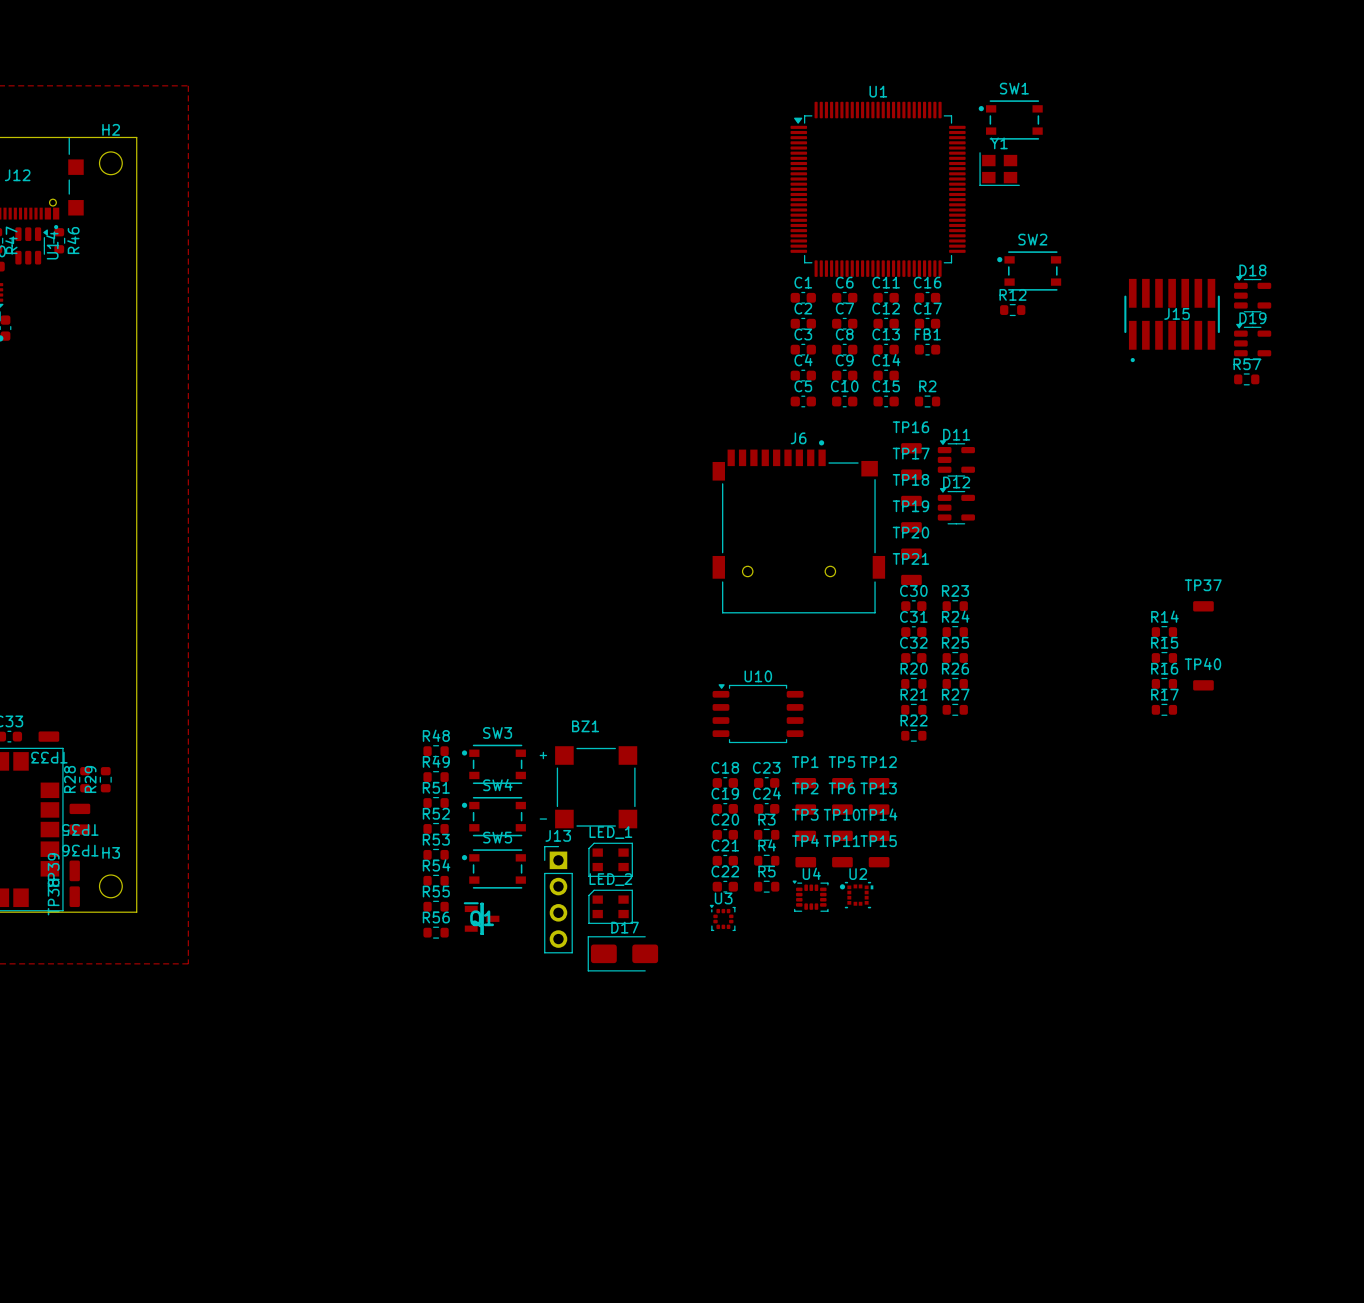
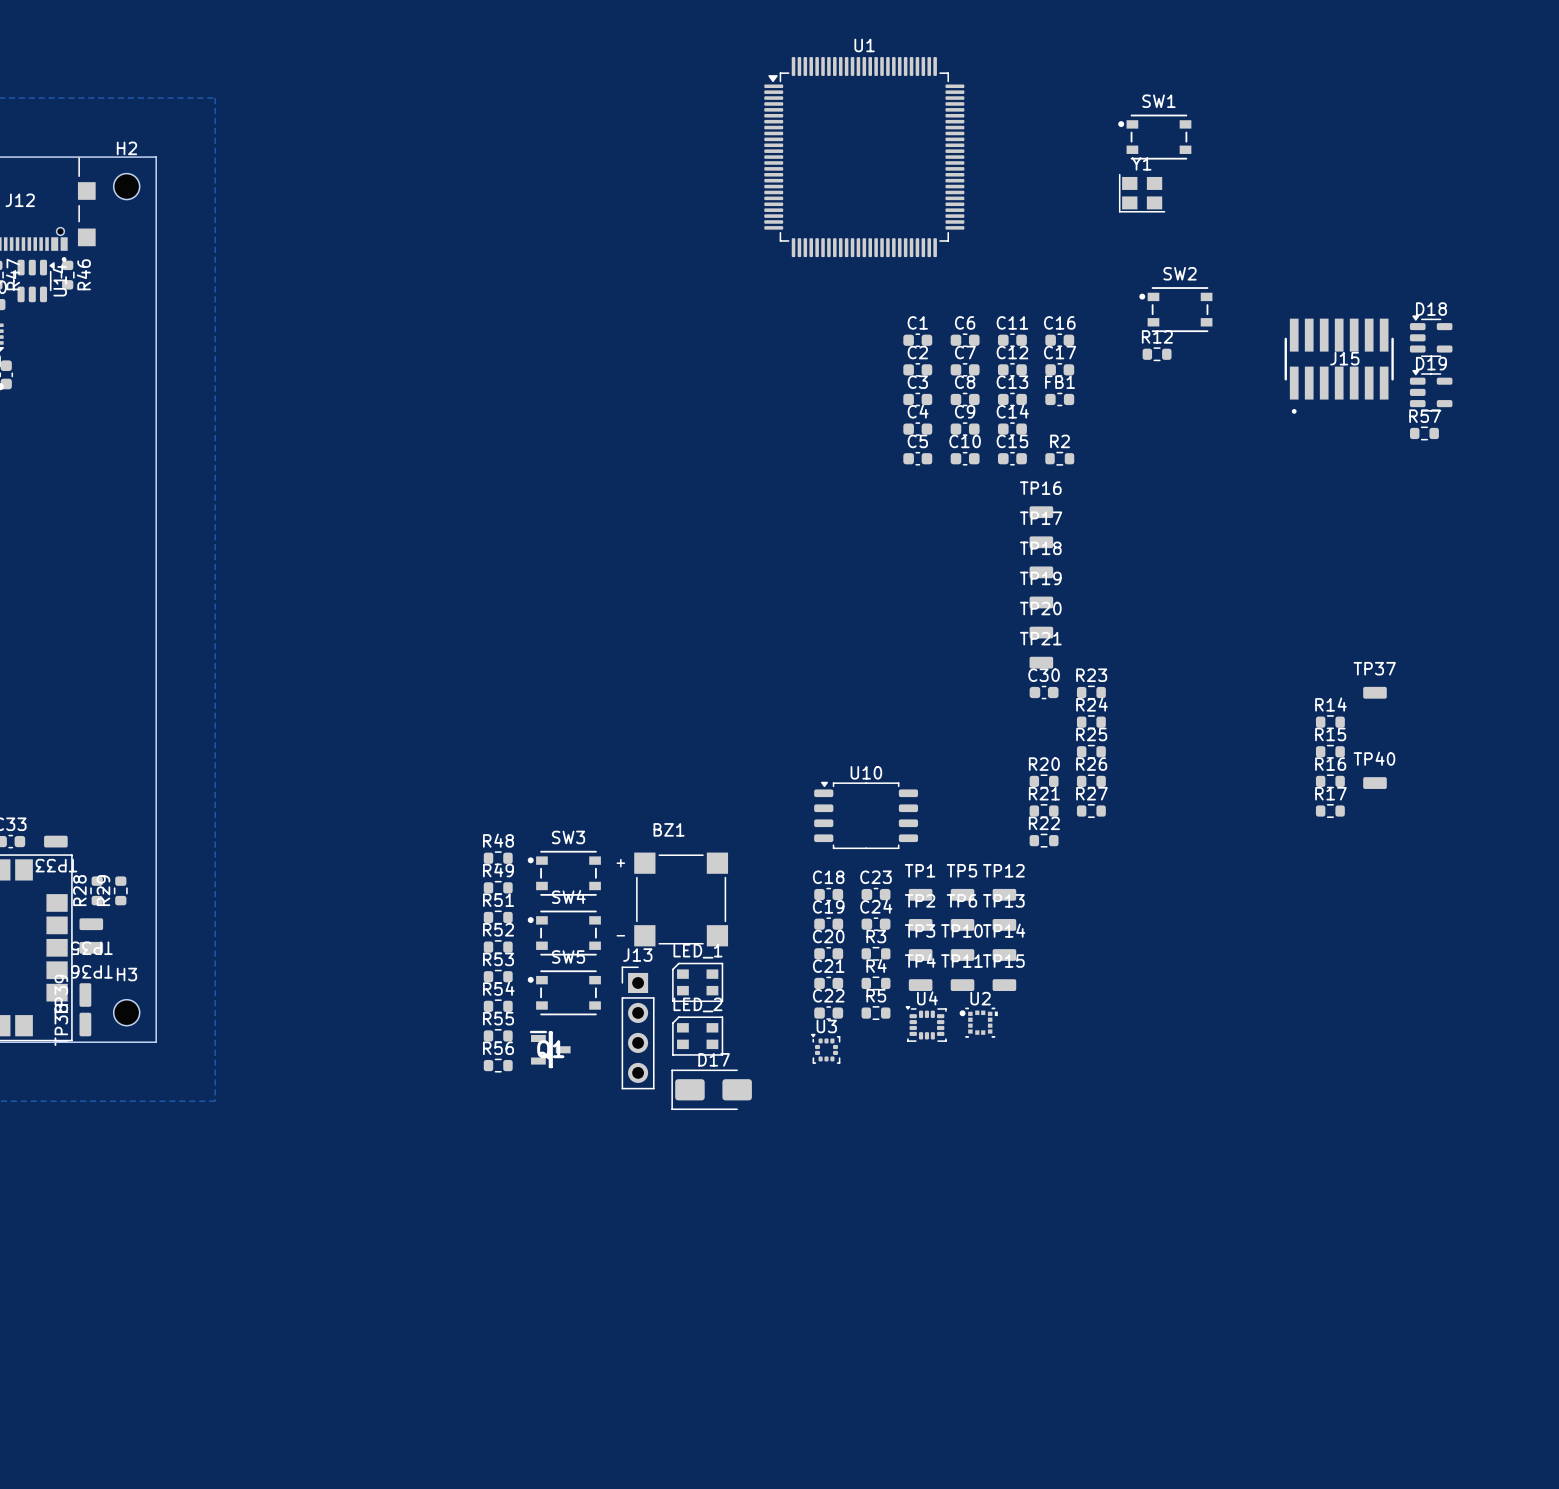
U1 position: (878, 189) -> (864, 157)
D11: (956, 458) -> none
D12: (956, 506) -> none
J6: (798, 526) -> none
C31: (913, 632) -> none
C32: (913, 657) -> none

